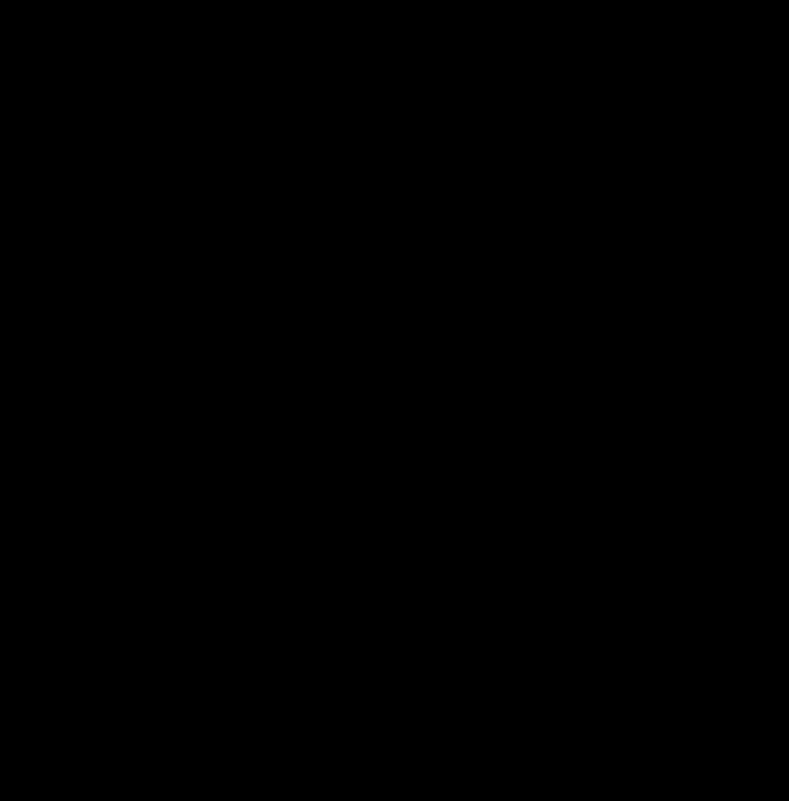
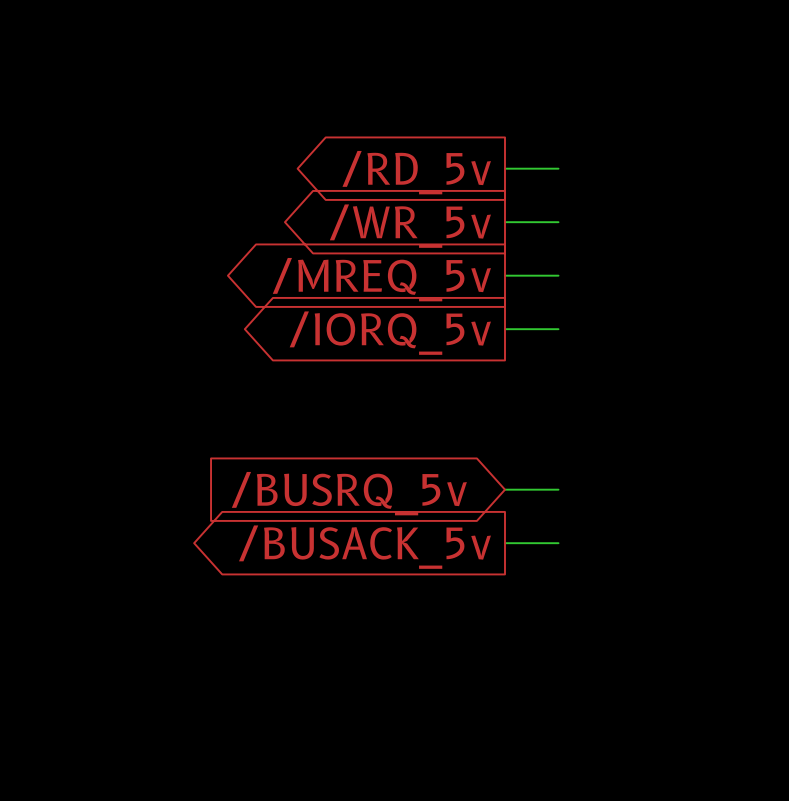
wire: none -> (504, 168) (558, 168)
global label: none -> /RD_5v (416, 172)
wire: none -> (504, 222) (558, 222)
global label: none -> /WR_5v (410, 226)
wire: none -> (504, 275) (558, 275)
global label: none -> /MREQ_5v (381, 279)
wire: none -> (504, 329) (558, 329)
global label: none -> /IORQ_5v (390, 333)
wire: none -> (504, 489) (558, 489)
global label: none -> /BUSRQ_5v (349, 493)
wire: none -> (504, 543) (558, 543)
global label: none -> /BUSACK_5v (364, 547)

